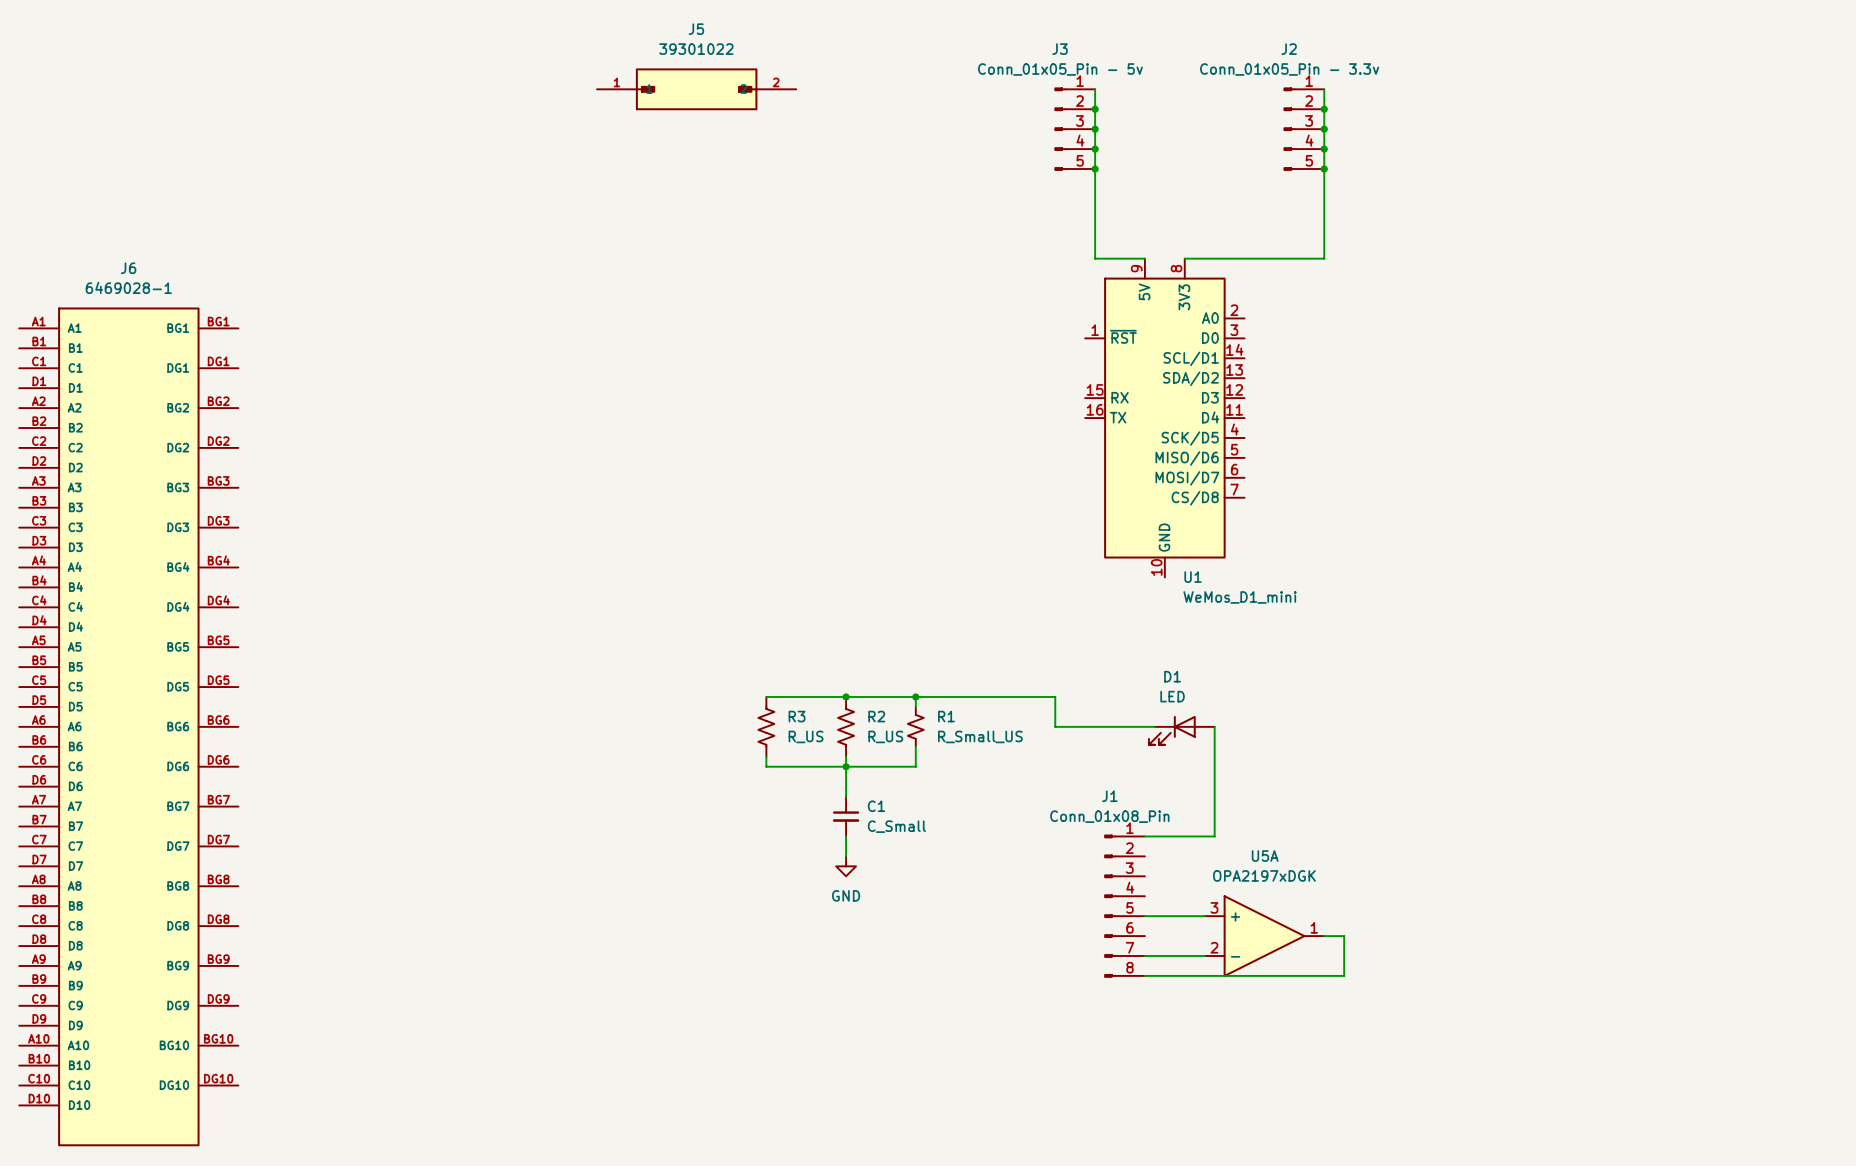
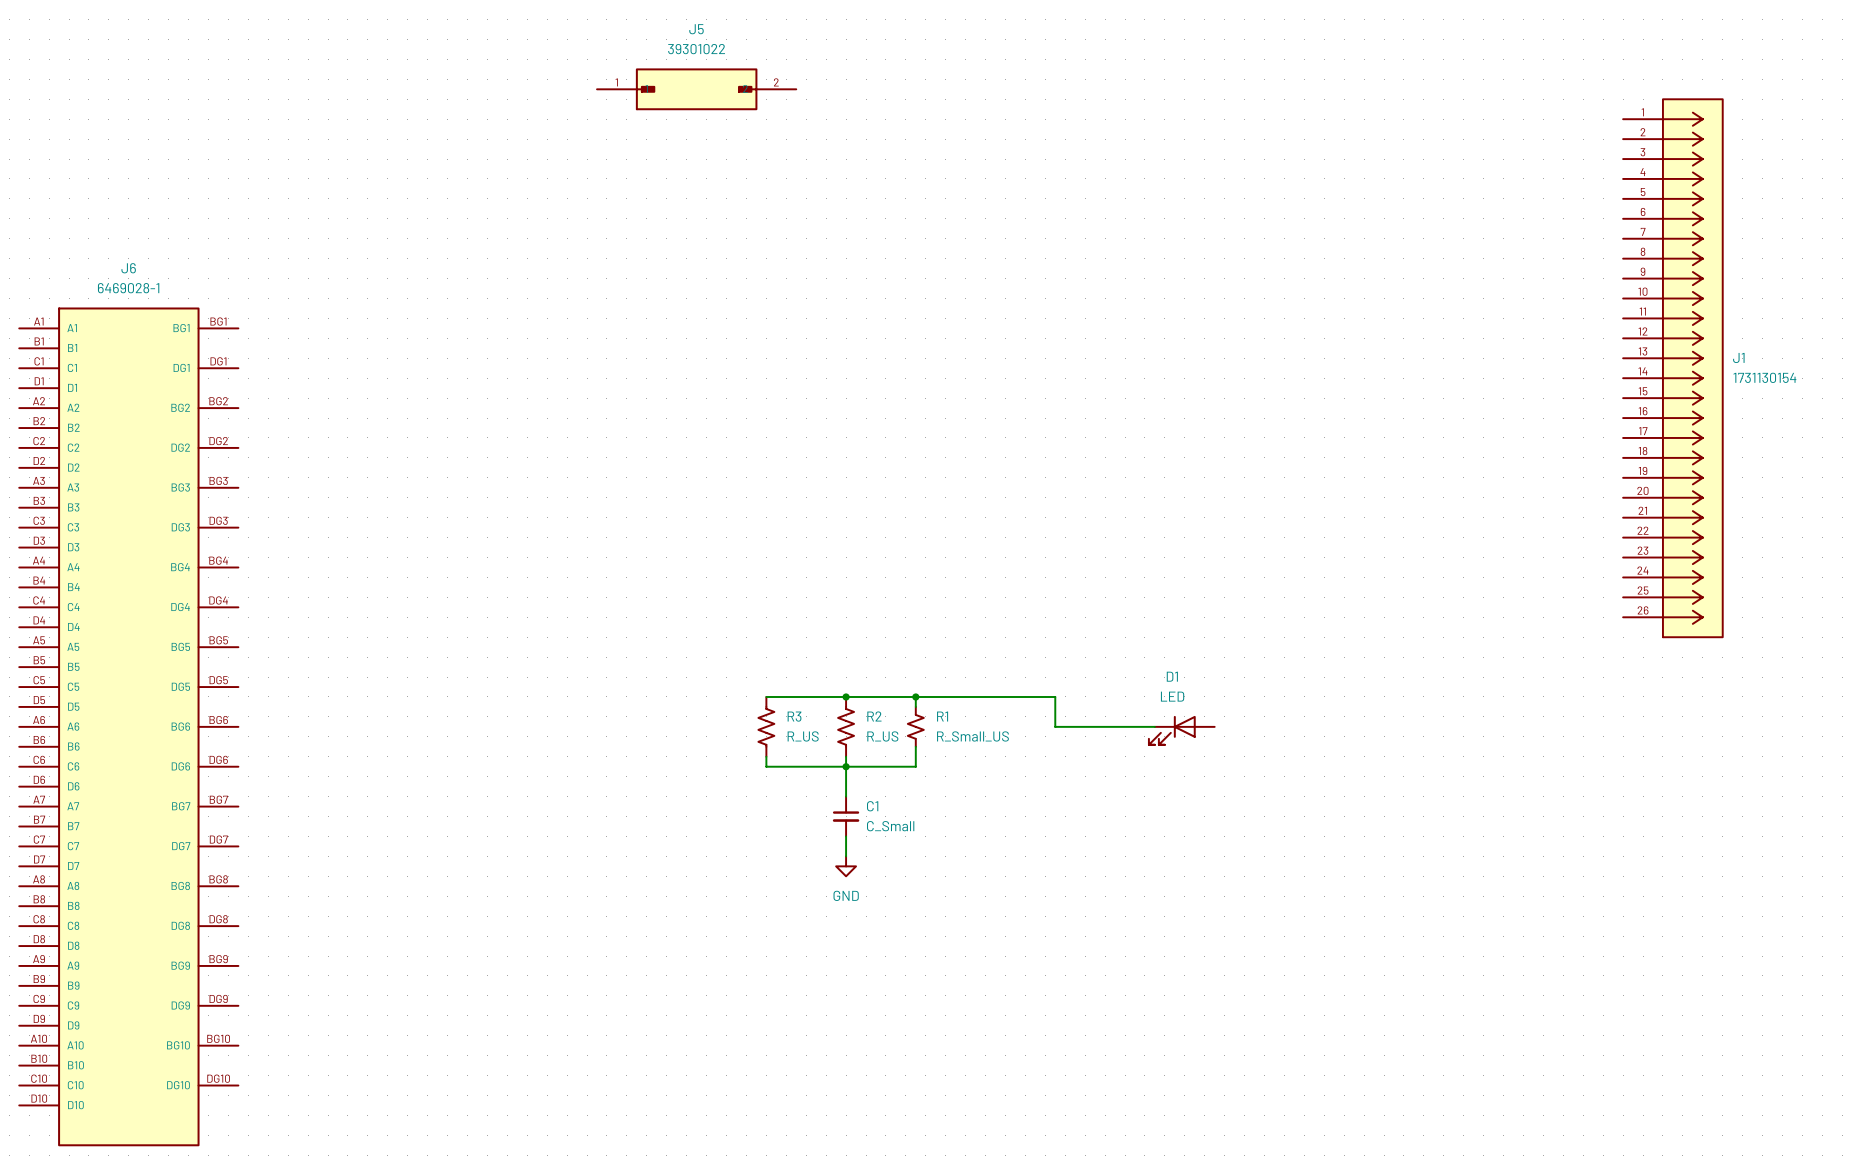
wire: (1095, 89) (1095, 258) (1144, 258) -> none
wire: (1324, 89) (1324, 258) (1184, 258) -> none
junction: (1095, 109) -> none
junction: (1324, 109) -> none
J3: Conn_01x05_Pin - 5v (1074, 129) -> none
junction: (1095, 129) -> none
J2: Conn_01x05_Pin - 3.3v (1304, 129) -> none
junction: (1324, 129) -> none
junction: (1095, 149) -> none
junction: (1324, 149) -> none
junction: (1095, 169) -> none
junction: (1324, 169) -> none
U1: WeMos_D1_mini (1164, 418) -> none
wire: (1214, 726) (1214, 836) (1144, 836) -> none
J1 name position: J1 (1109, 796) -> J1 (1738, 357)
J1 value: Conn_01x08_Pin (1109, 816) -> 1731130154 (1764, 377)
J1 symbol: [1104, 834, 1145, 978] -> [1623, 98, 1724, 638]
wire: (1144, 916) (1204, 916) -> none
U5A: OPA2197xDGK (1264, 936) -> none
wire: (1324, 936) (1344, 936) (1344, 975) (1144, 975) -> none
wire: (1144, 956) (1204, 956) -> none

